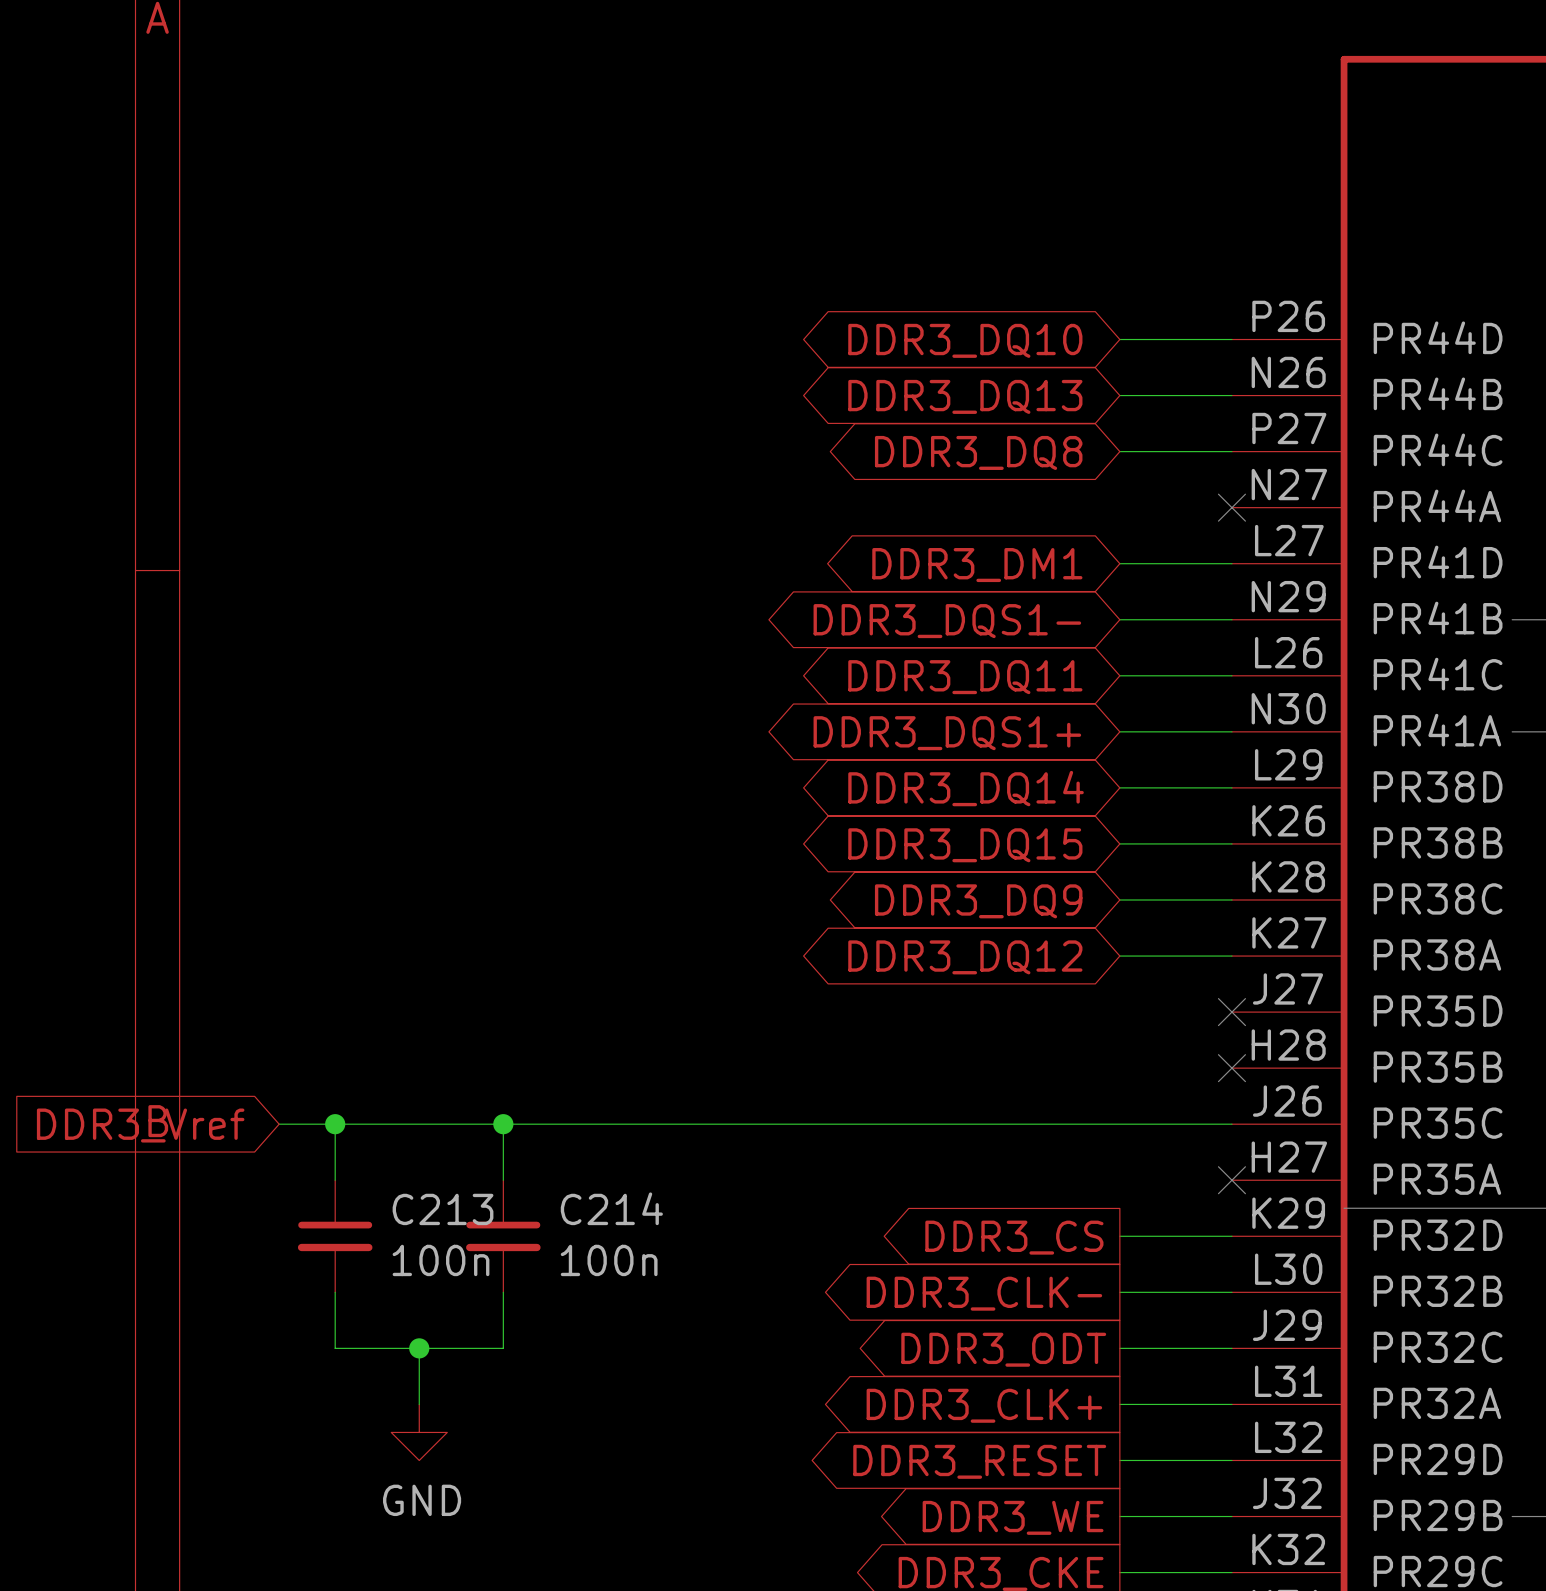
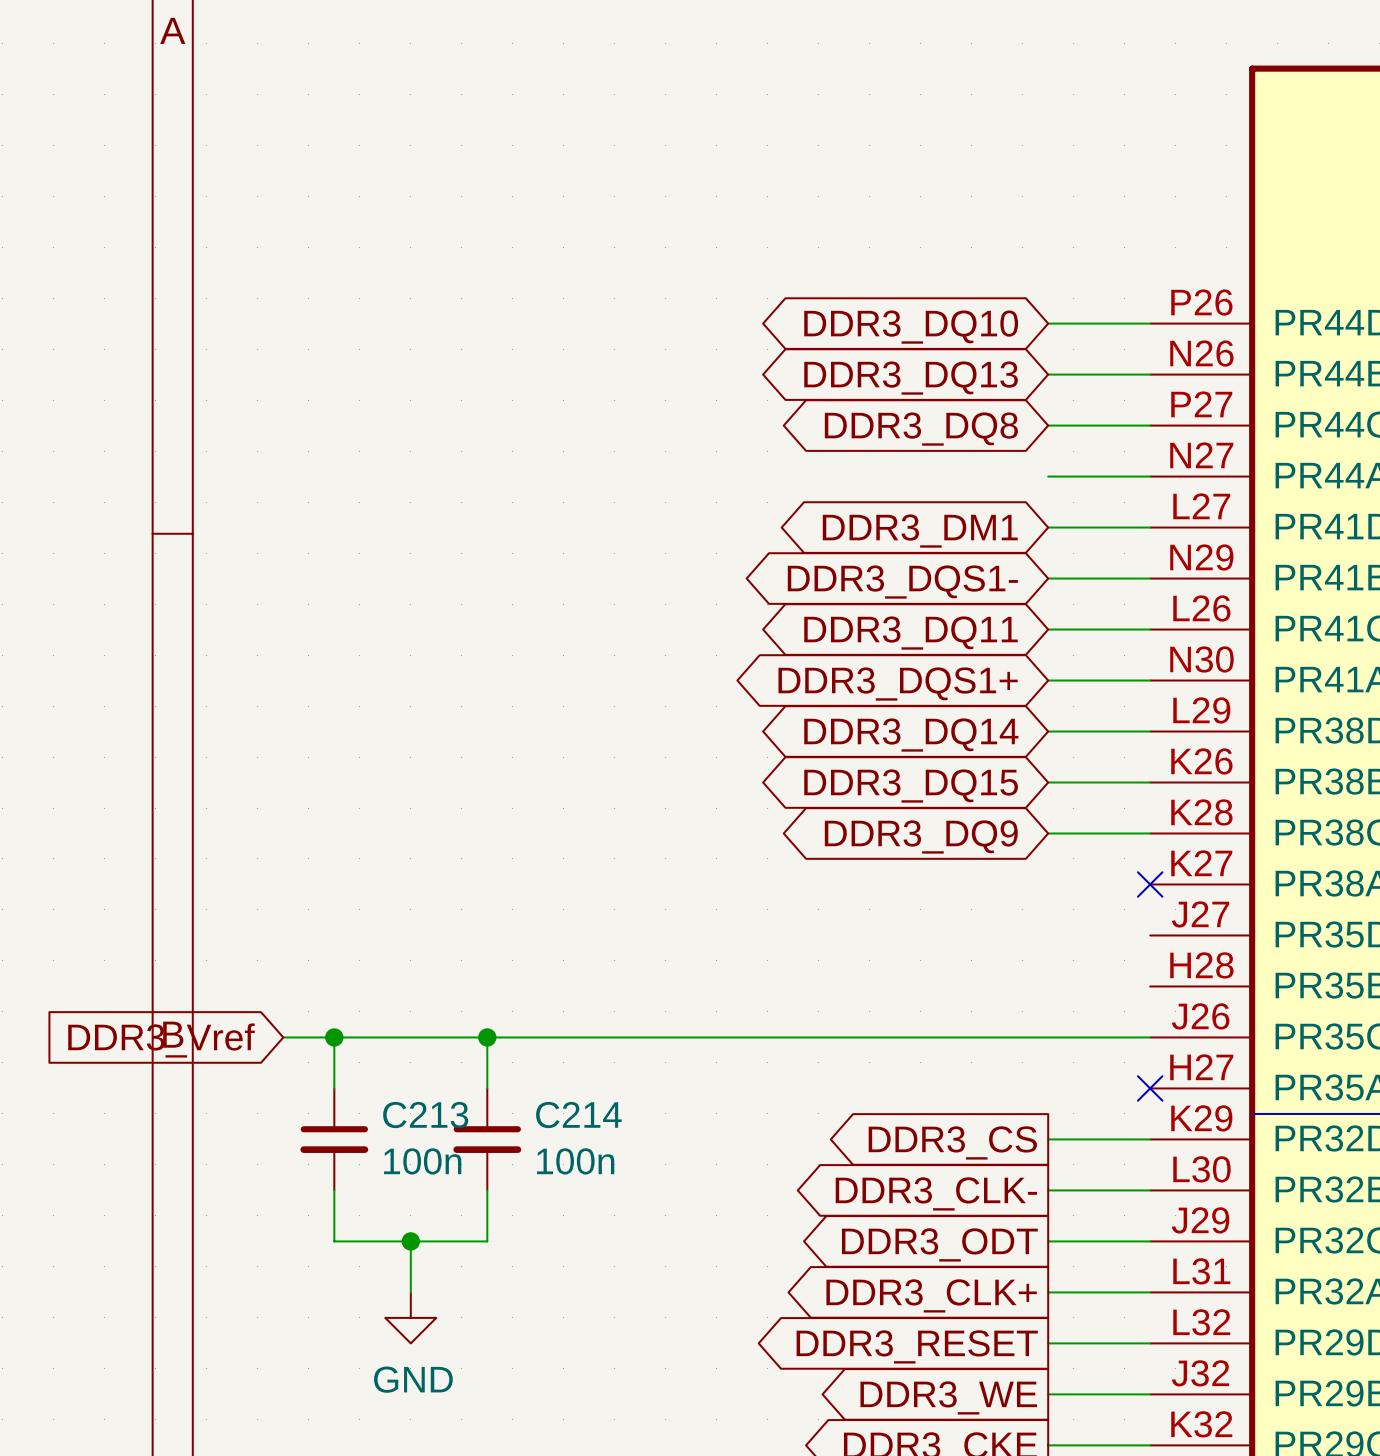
no-connect mark: (1231, 507) -> none
wire: (1119, 956) (1231, 956) -> (1048, 476) (1150, 476)
no-connect mark: none -> (1150, 884)
global label: DDR3_DQ12 (965, 957) -> none
no-connect mark: (1231, 1012) -> none
no-connect mark: (1231, 1068) -> none

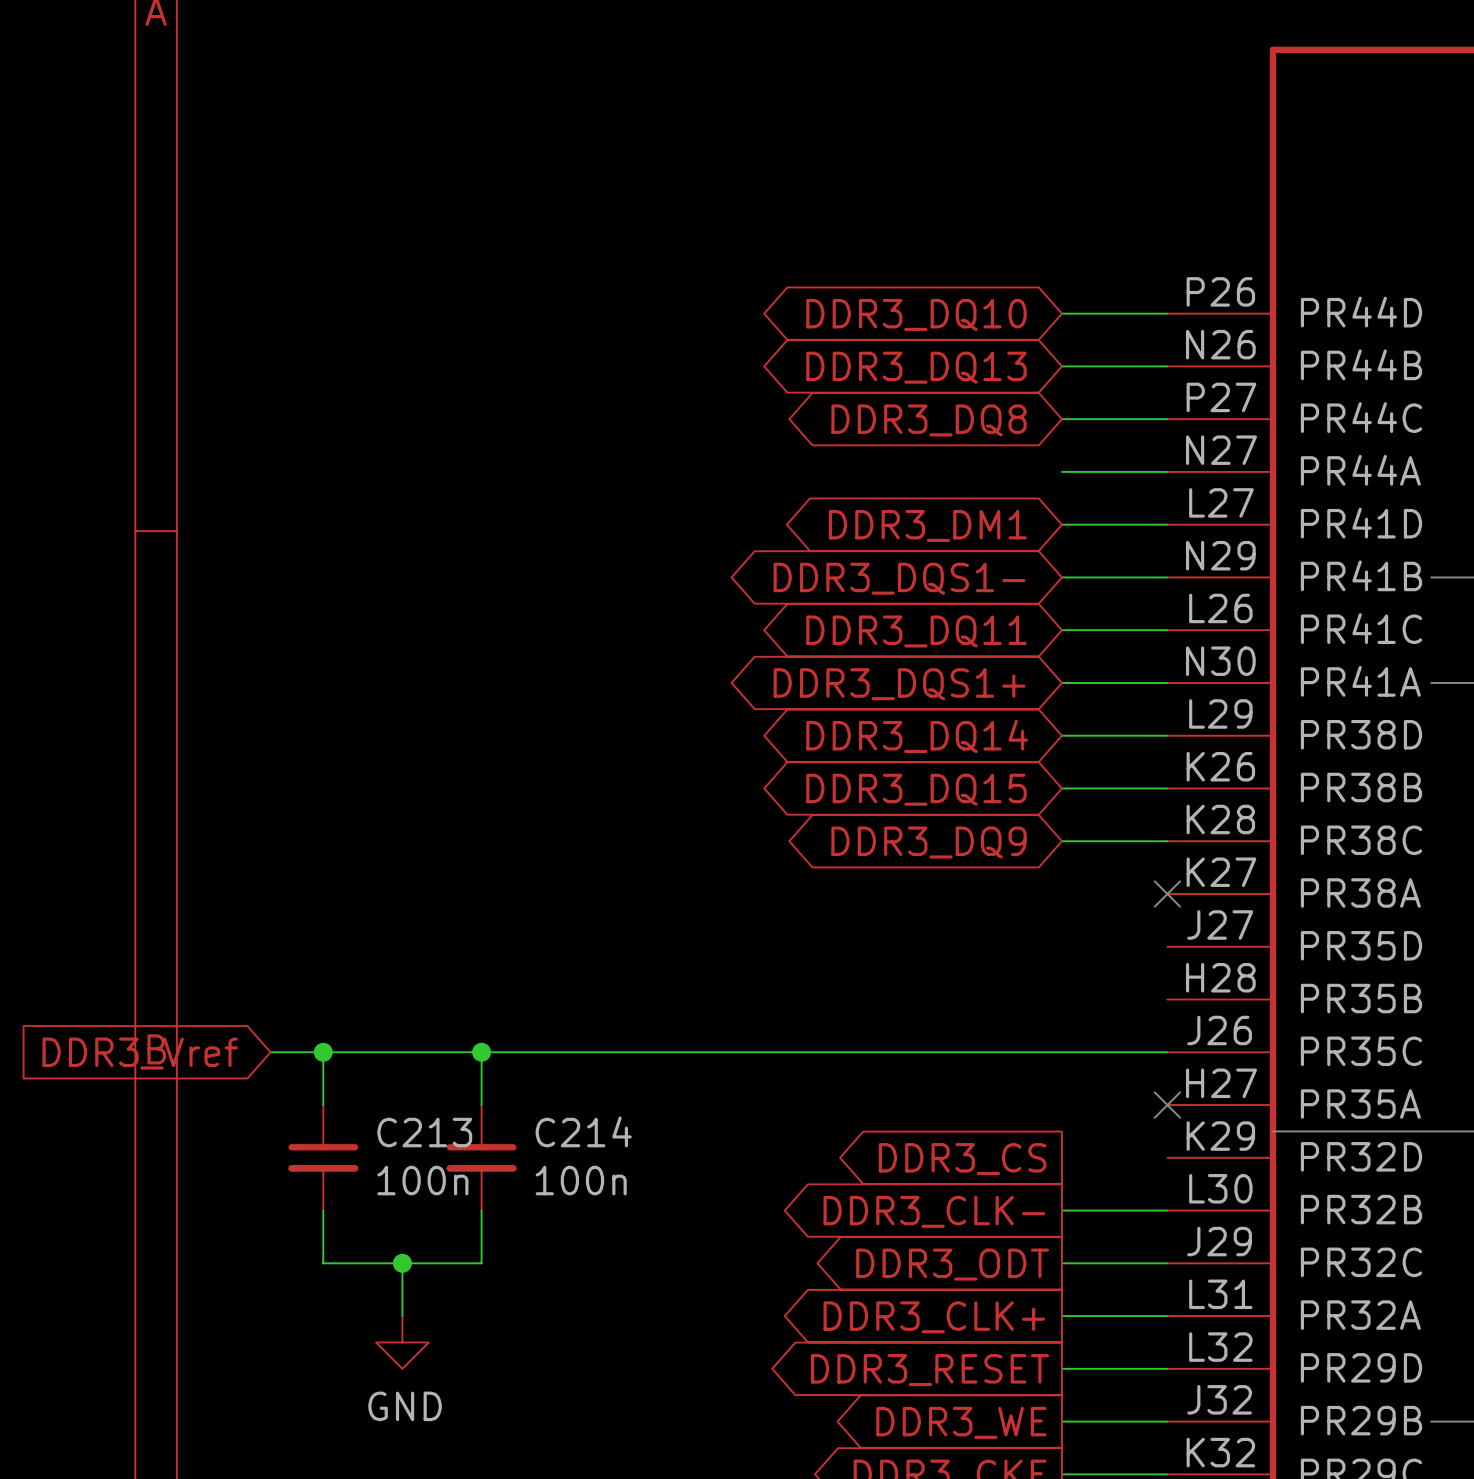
wire: (1048, 1139) (1150, 1139) -> none

